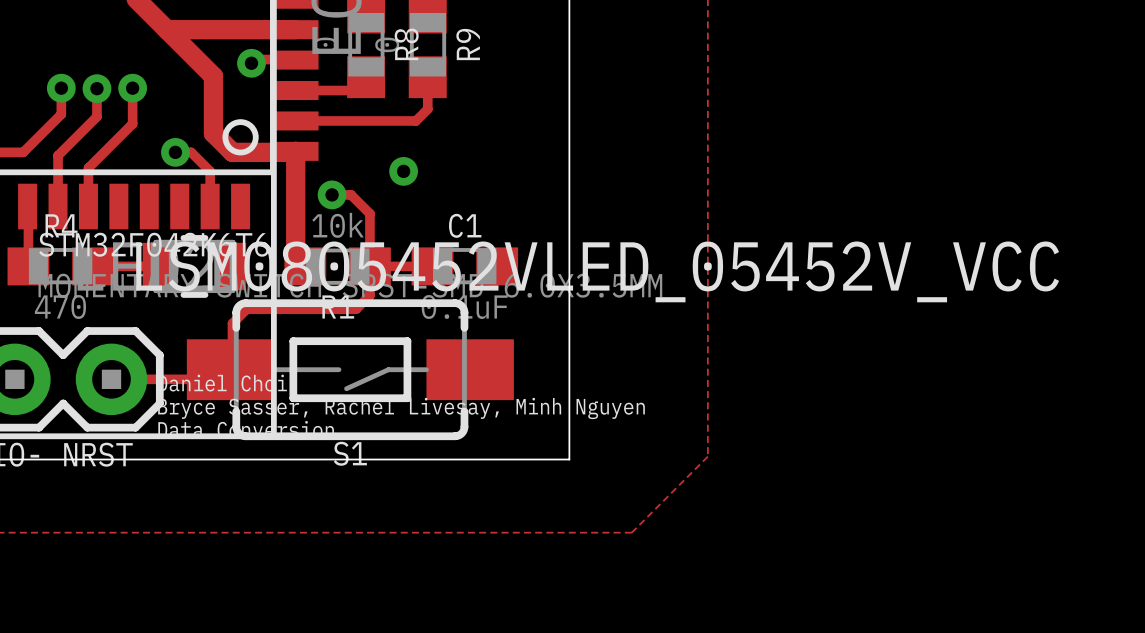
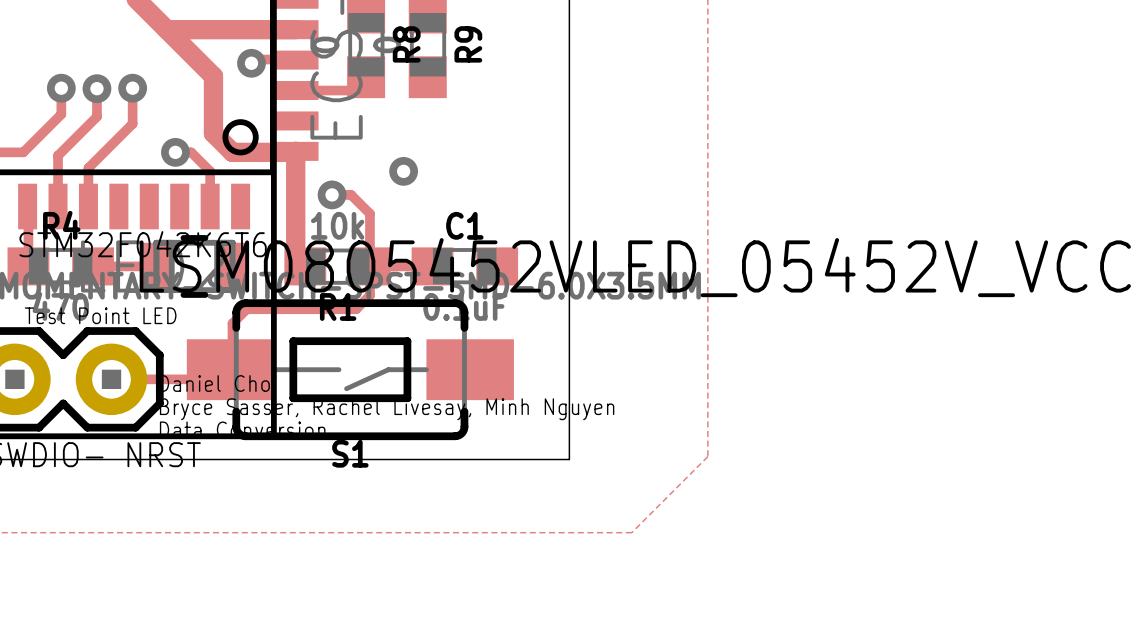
track: (427, 77) (427, 109) (416, 120) (295, 120) -> none
text: none -> Test Point LED (100, 315)

